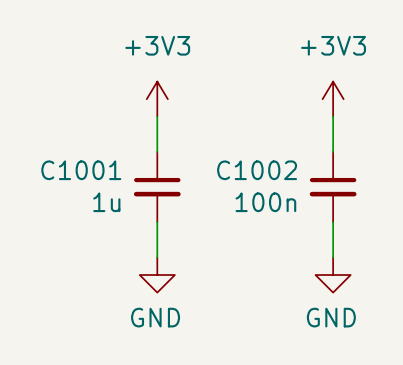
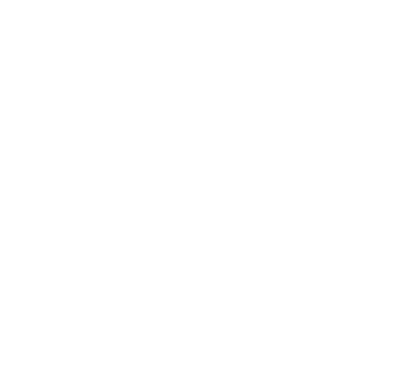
power symbol: +3V3 (157, 99) -> none
power symbol: +3V3 (333, 99) -> none
wire: (157, 116) (157, 151) -> none
wire: (333, 116) (333, 151) -> none
C1001: 1u (157, 187) -> none
C1002: 100n (333, 187) -> none
wire: (157, 222) (157, 257) -> none
wire: (333, 222) (333, 257) -> none
power symbol: GND (157, 275) -> none
power symbol: GND (333, 275) -> none

